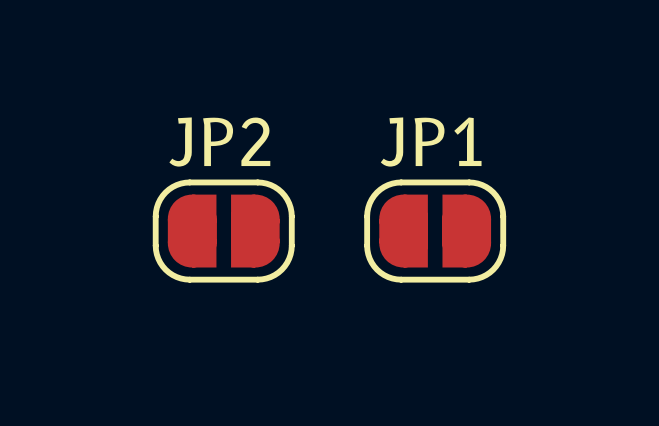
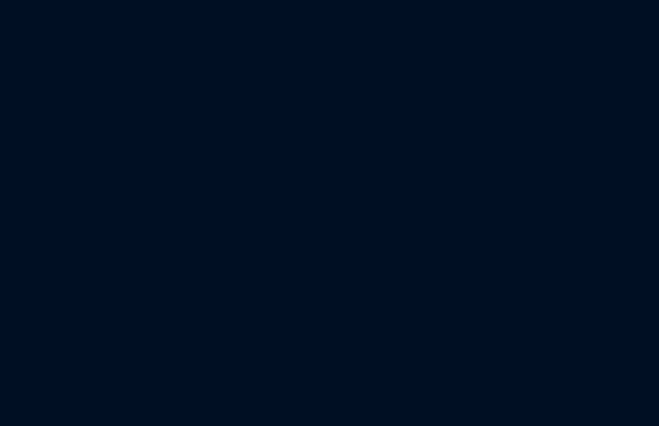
JP2: (223, 231) -> none
JP1: (435, 231) -> none

